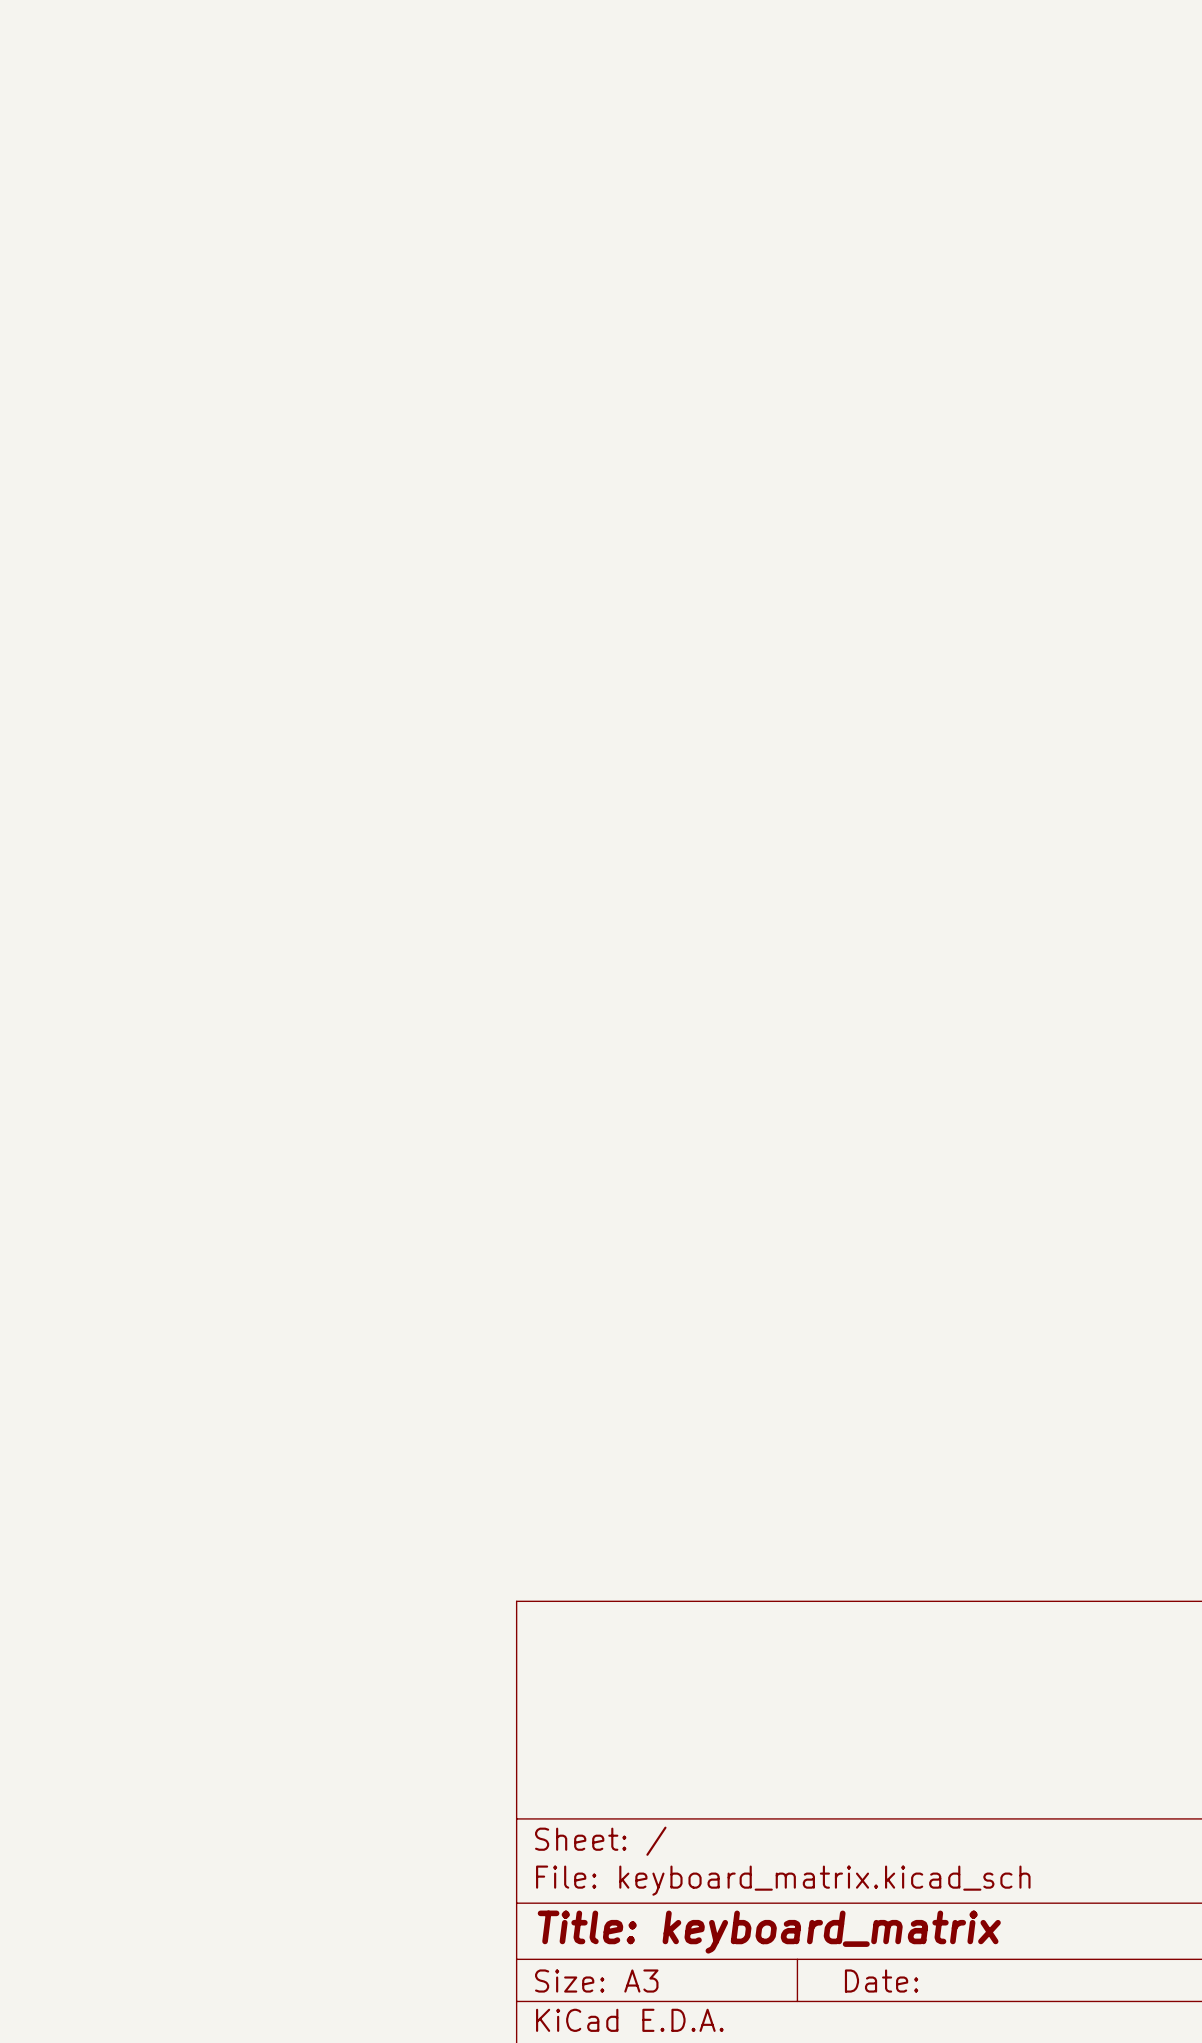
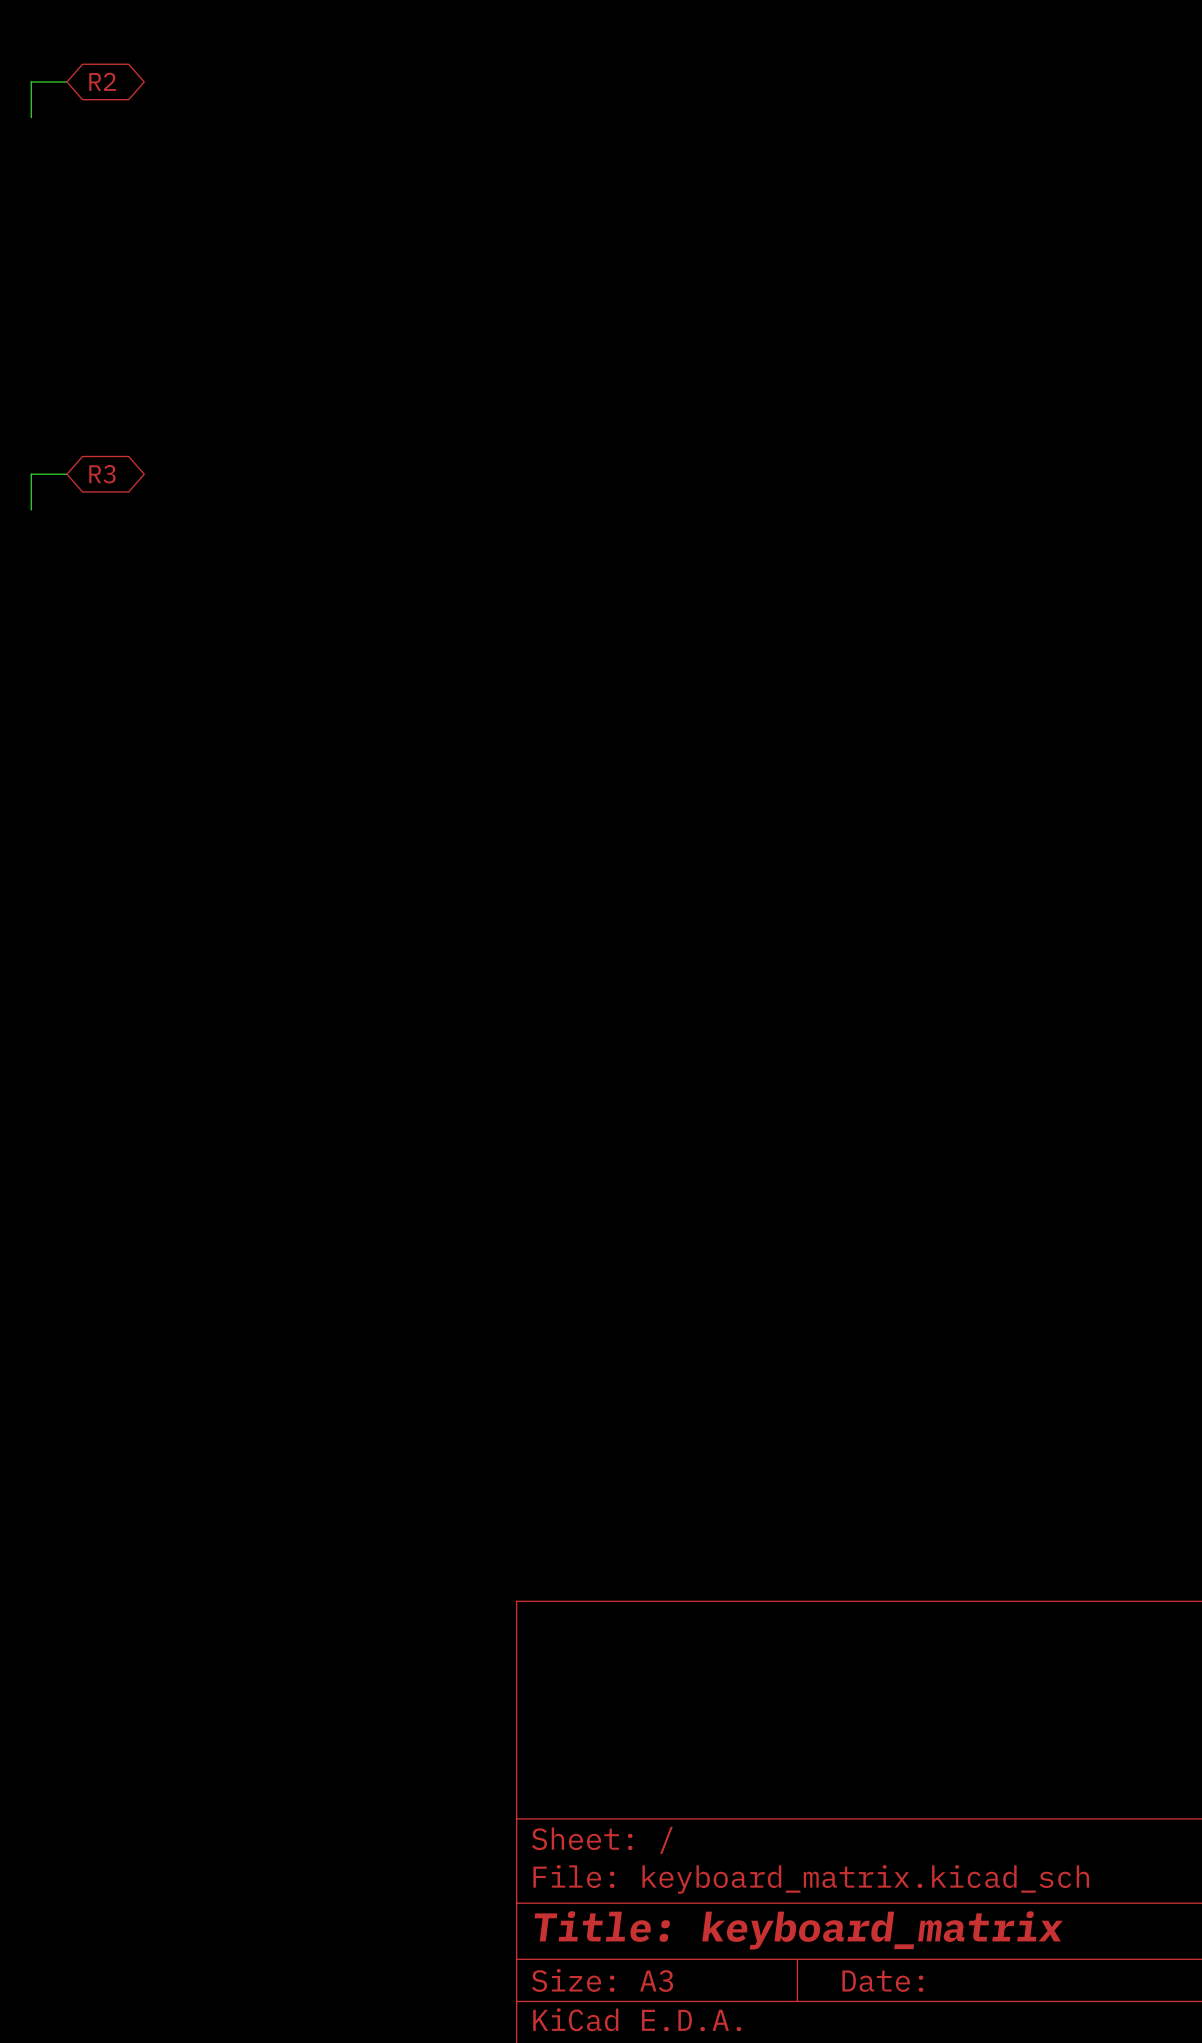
wire: none -> (66, 81) (31, 81) (31, 117)
global label: none -> R2 (102, 81)
wire: none -> (66, 474) (31, 474) (31, 509)
global label: none -> R3 (102, 474)

